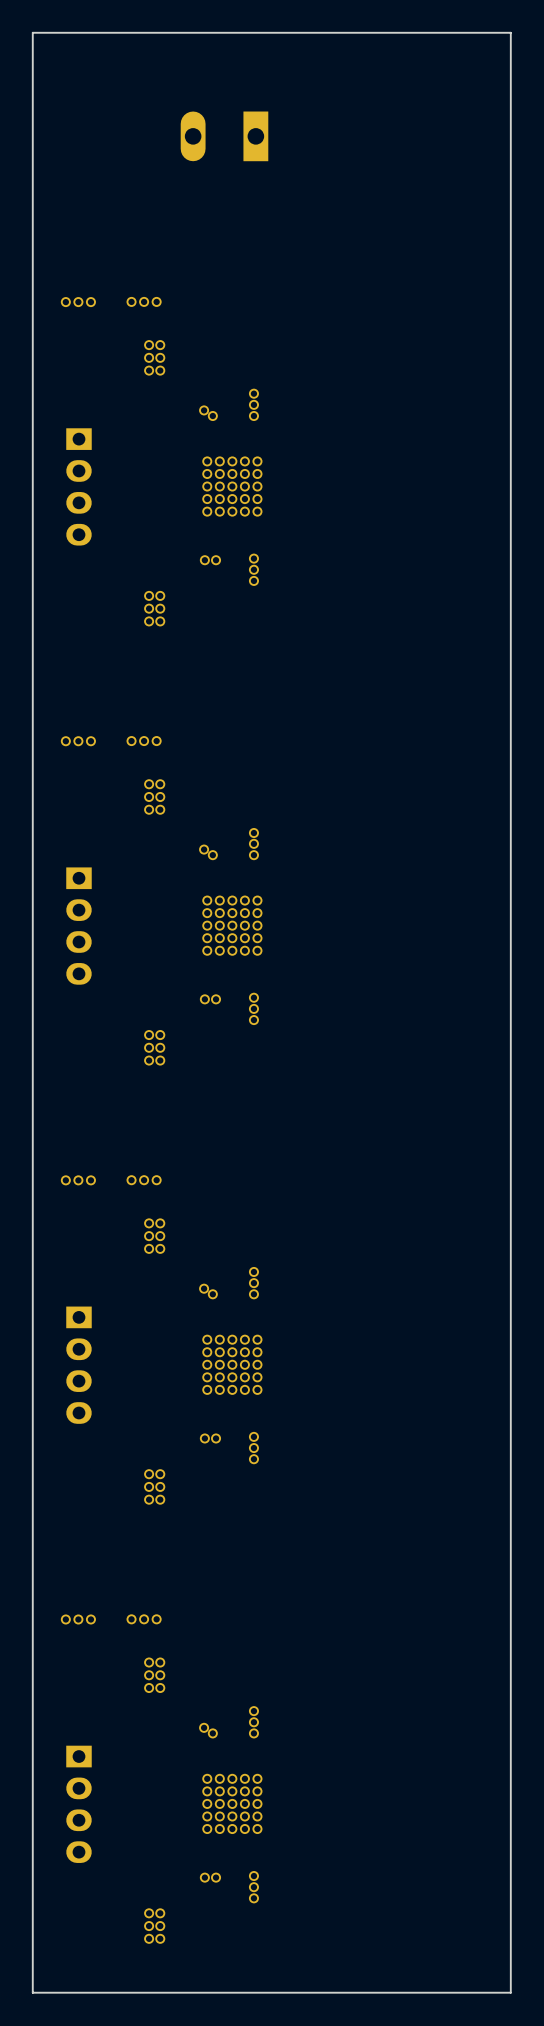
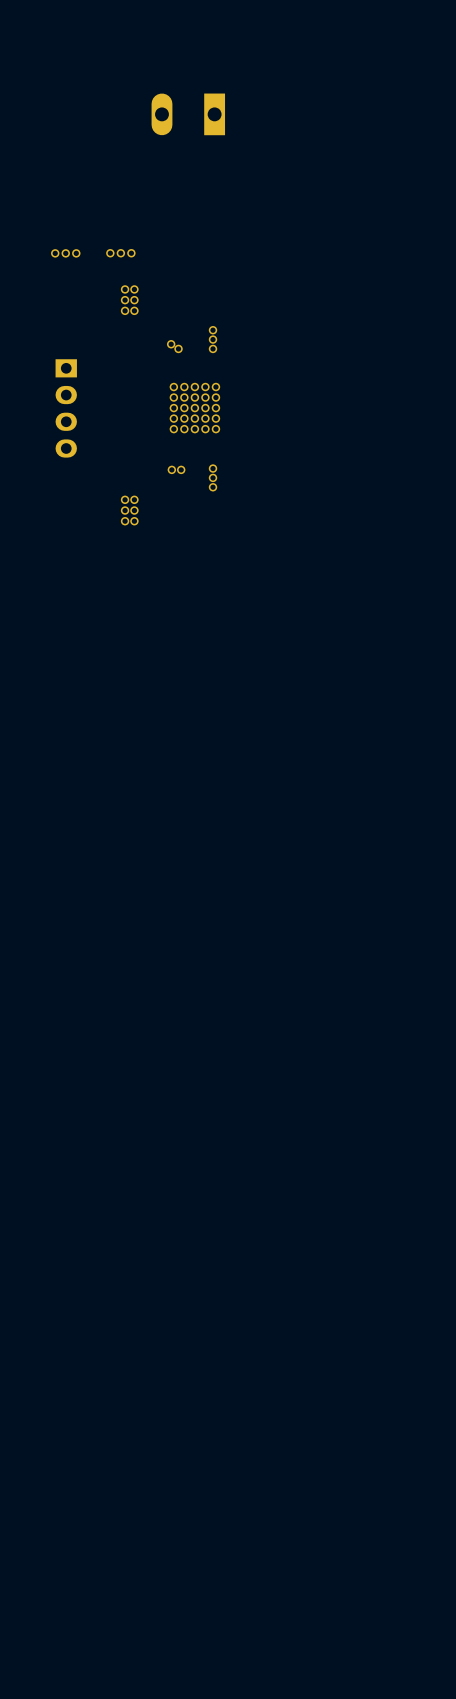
board edge: (510, 32) (510, 1992) (32, 1992) (32, 32) (510, 32) -> none
part: (65, 741) -> none
part: (78, 741) -> none
part: (90, 741) -> none
part: (131, 741) -> none
part: (144, 741) -> none
part: (156, 741) -> none
part: (149, 784) -> none
part: (160, 784) -> none
part: (149, 796) -> none
part: (160, 796) -> none
part: (149, 809) -> none
part: (160, 809) -> none
part: (253, 833) -> none
part: (253, 843) -> none
part: (204, 849) -> none
part: (212, 855) -> none
part: (253, 855) -> none
part: (207, 900) -> none
part: (219, 900) -> none
part: (232, 900) -> none
part: (244, 900) -> none
part: (257, 900) -> none
part: (207, 913) -> none
part: (219, 913) -> none
part: (232, 913) -> none
part: (244, 913) -> none
part: (257, 913) -> none
part: (207, 925) -> none
part: (219, 925) -> none
part: (232, 925) -> none
part: (244, 925) -> none
part: (257, 925) -> none
part: (78, 926) -> none
part: (207, 938) -> none
part: (219, 938) -> none
part: (232, 938) -> none
part: (244, 938) -> none
part: (257, 938) -> none
part: (207, 950) -> none
part: (219, 950) -> none
part: (232, 950) -> none
part: (244, 950) -> none
part: (257, 950) -> none
part: (253, 997) -> none
part: (204, 999) -> none
part: (216, 999) -> none
part: (253, 1008) -> none
part: (253, 1020) -> none
part: (149, 1035) -> none
part: (160, 1035) -> none
part: (149, 1047) -> none
part: (160, 1047) -> none
part: (149, 1060) -> none
part: (160, 1060) -> none
part: (65, 1180) -> none
part: (78, 1180) -> none
part: (90, 1180) -> none
part: (131, 1180) -> none
part: (144, 1180) -> none
part: (156, 1180) -> none
part: (149, 1223) -> none
part: (160, 1223) -> none
part: (149, 1236) -> none
part: (160, 1236) -> none
part: (149, 1248) -> none
part: (160, 1248) -> none
part: (253, 1271) -> none
part: (253, 1283) -> none
part: (204, 1288) -> none
part: (212, 1294) -> none
part: (253, 1294) -> none
part: (207, 1339) -> none
part: (219, 1339) -> none
part: (232, 1339) -> none
part: (244, 1339) -> none
part: (257, 1339) -> none
part: (207, 1352) -> none
part: (219, 1352) -> none
part: (232, 1352) -> none
part: (244, 1352) -> none
part: (257, 1352) -> none
part: (207, 1364) -> none
part: (219, 1364) -> none
part: (232, 1364) -> none
part: (244, 1364) -> none
part: (257, 1364) -> none
part: (78, 1365) -> none
part: (207, 1377) -> none
part: (219, 1377) -> none
part: (232, 1377) -> none
part: (244, 1377) -> none
part: (257, 1377) -> none
part: (207, 1389) -> none
part: (219, 1389) -> none
part: (232, 1389) -> none
part: (244, 1389) -> none
part: (257, 1389) -> none
part: (253, 1436) -> none
part: (204, 1438) -> none
part: (216, 1438) -> none
part: (253, 1448) -> none
part: (253, 1459) -> none
part: (149, 1474) -> none
part: (160, 1474) -> none
part: (149, 1486) -> none
part: (160, 1486) -> none
part: (149, 1499) -> none
part: (160, 1499) -> none
part: (65, 1619) -> none
part: (78, 1619) -> none
part: (90, 1619) -> none
part: (131, 1619) -> none
part: (144, 1619) -> none
part: (156, 1619) -> none
part: (149, 1662) -> none
part: (160, 1662) -> none
part: (149, 1675) -> none
part: (160, 1675) -> none
part: (149, 1688) -> none
part: (160, 1688) -> none
part: (253, 1711) -> none
part: (253, 1722) -> none
part: (204, 1727) -> none
part: (212, 1733) -> none
part: (253, 1733) -> none
part: (207, 1778) -> none
part: (219, 1778) -> none
part: (232, 1778) -> none
part: (244, 1778) -> none
part: (257, 1778) -> none
part: (207, 1791) -> none
part: (219, 1791) -> none
part: (232, 1791) -> none
part: (244, 1791) -> none
part: (257, 1791) -> none
part: (207, 1803) -> none
part: (219, 1803) -> none
part: (232, 1803) -> none
part: (244, 1803) -> none
part: (257, 1803) -> none
part: (78, 1804) -> none
part: (207, 1816) -> none
part: (219, 1816) -> none
part: (232, 1816) -> none
part: (244, 1816) -> none
part: (257, 1816) -> none
part: (207, 1829) -> none
part: (219, 1829) -> none
part: (232, 1829) -> none
part: (244, 1829) -> none
part: (257, 1829) -> none
part: (253, 1876) -> none
part: (204, 1877) -> none
part: (216, 1877) -> none
part: (253, 1887) -> none
part: (253, 1898) -> none
part: (149, 1913) -> none
part: (160, 1913) -> none
part: (149, 1926) -> none
part: (160, 1926) -> none
part: (149, 1938) -> none
part: (160, 1938) -> none

